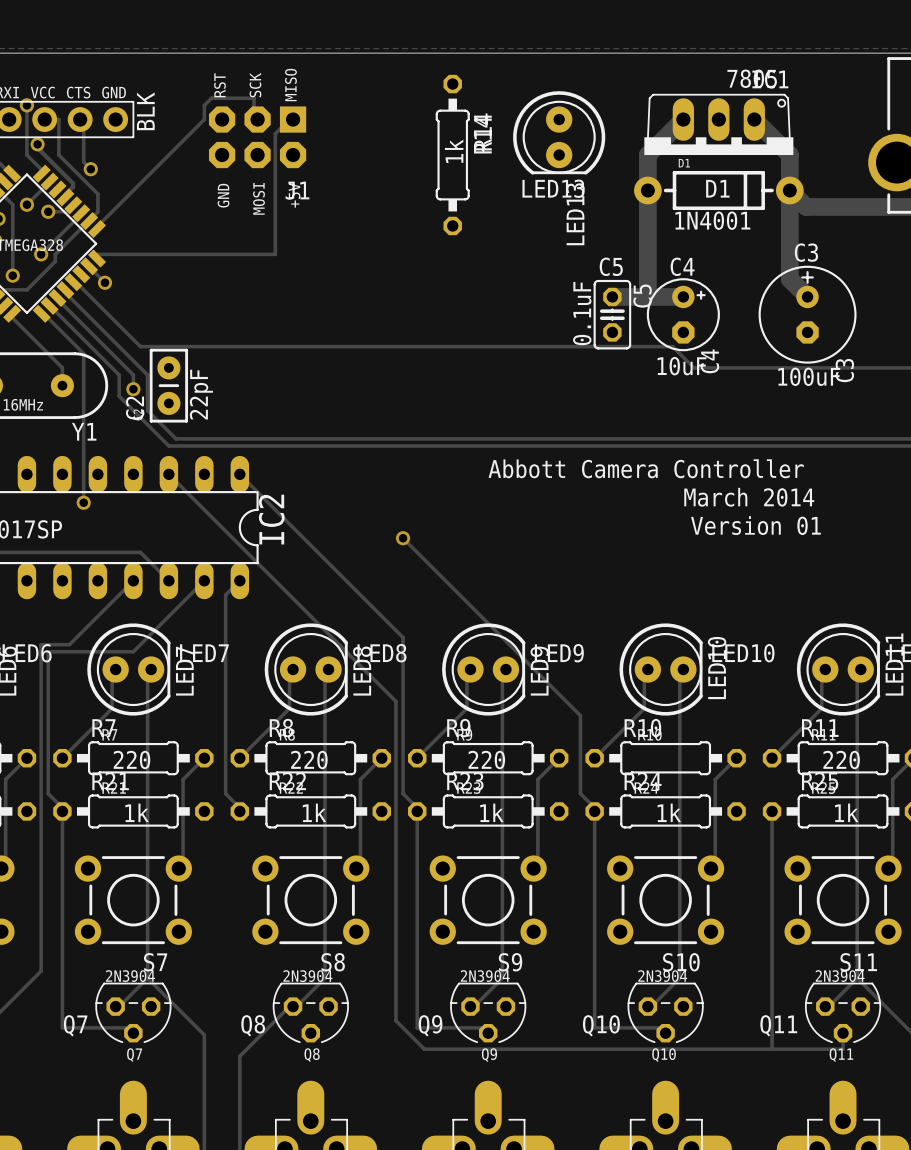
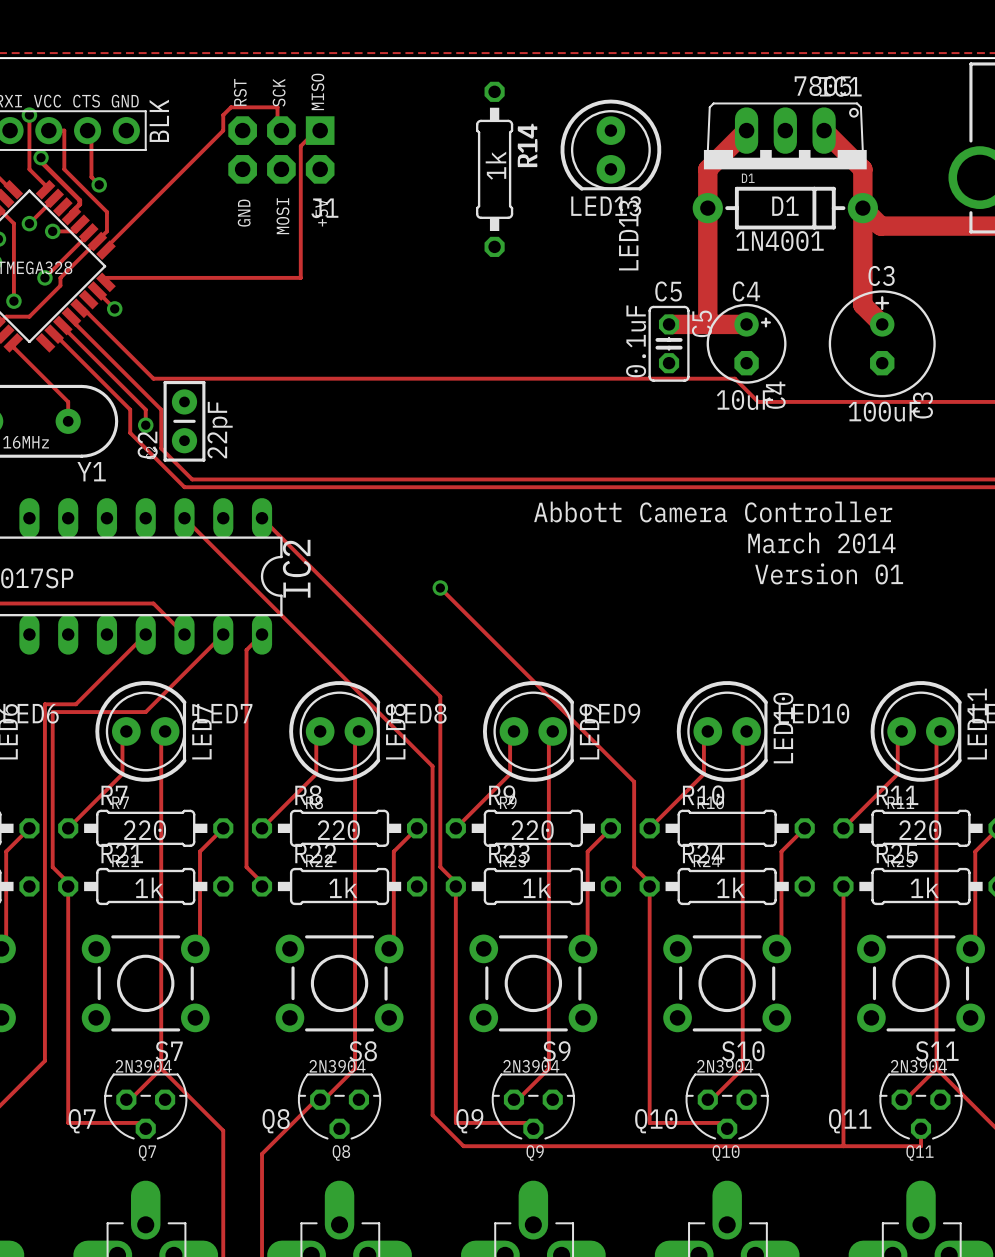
track: (41, 313) (83, 353) (83, 502) -> none
via: (83, 502) -> none

